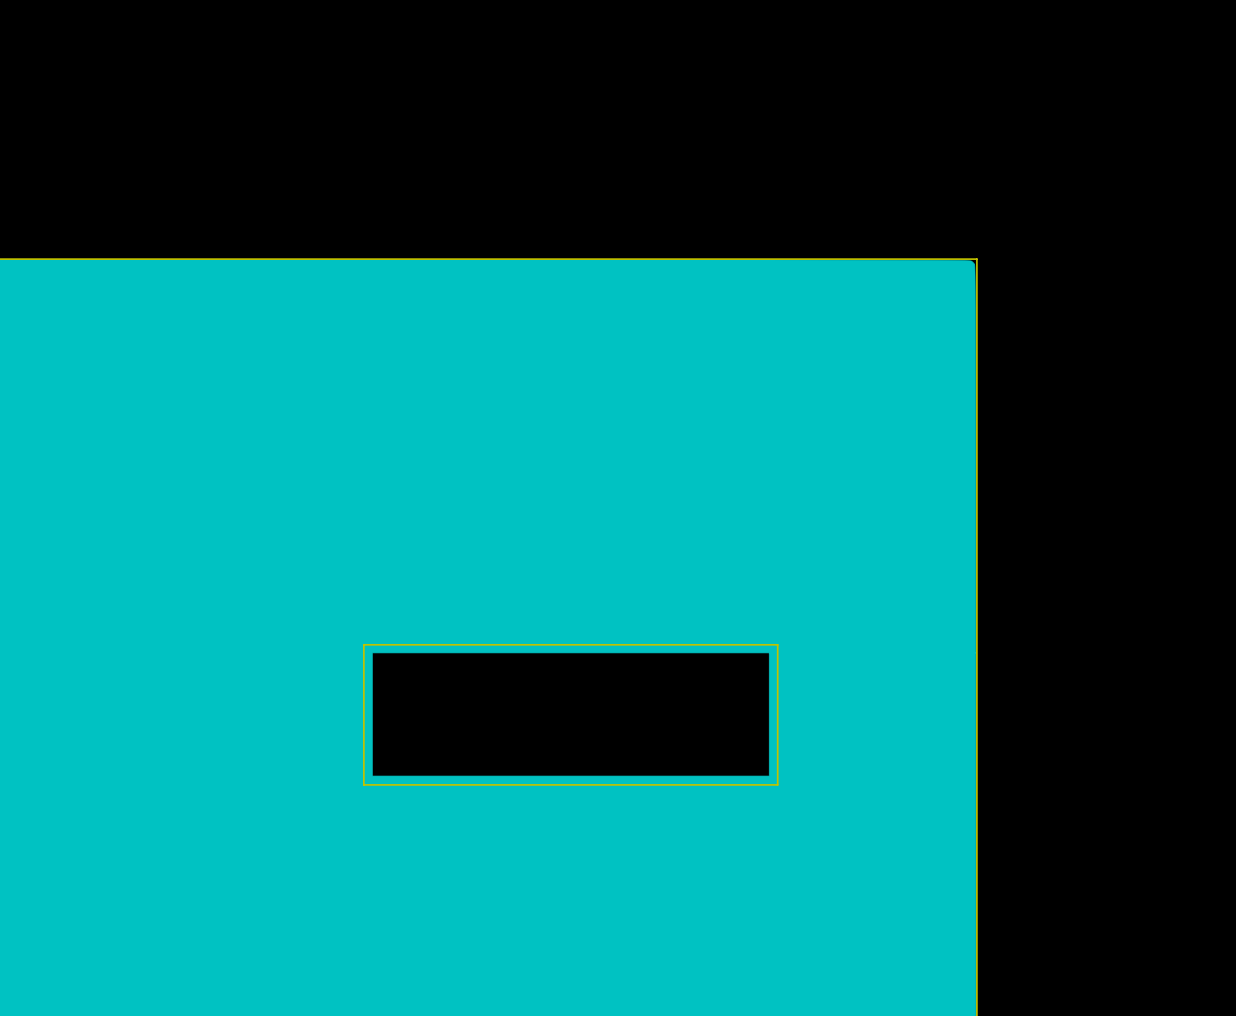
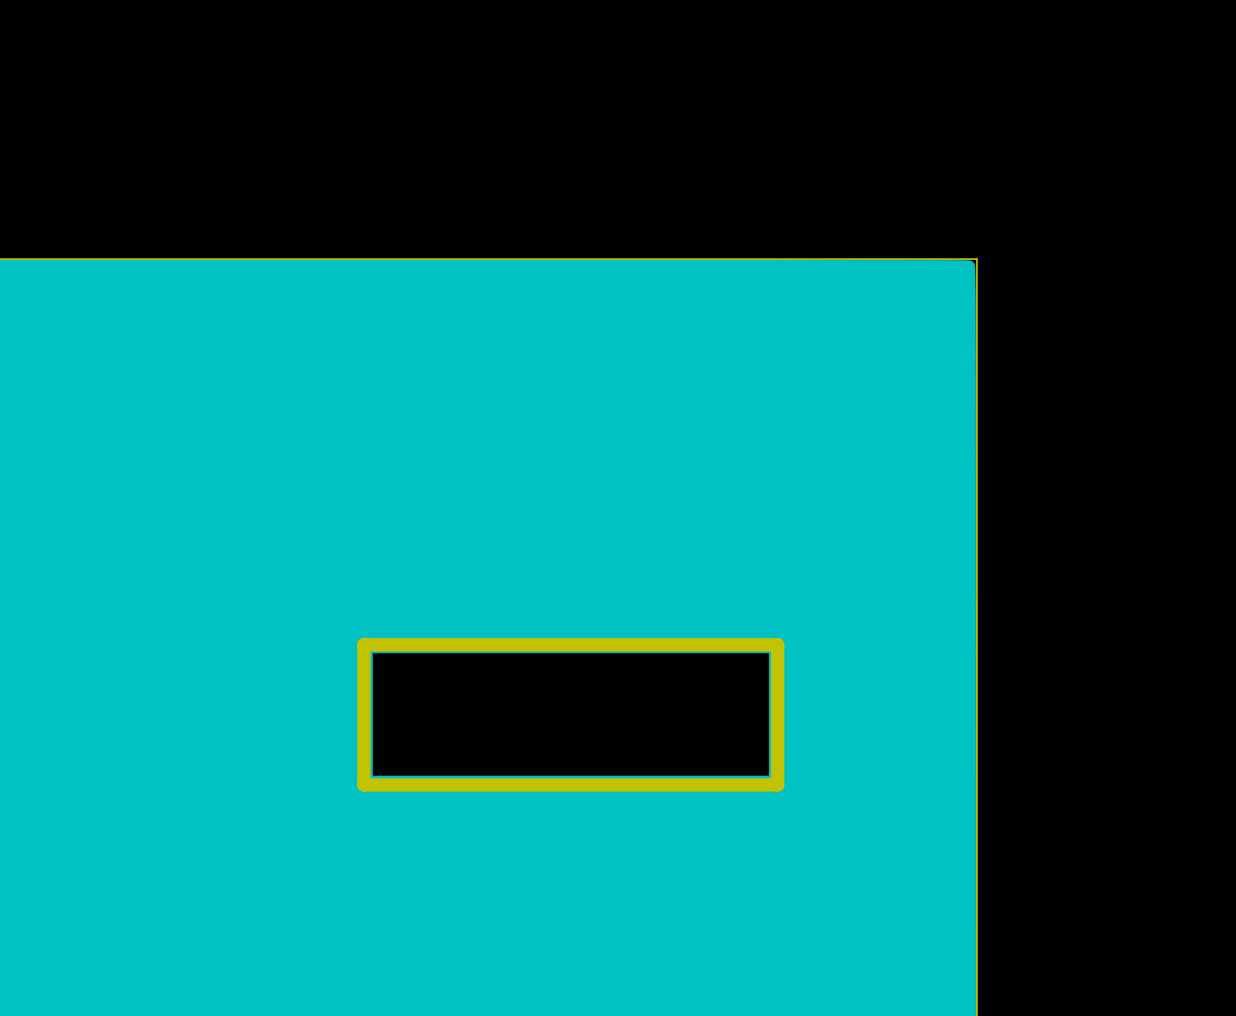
board edge width: thin (777, 644) (363, 644) (363, 784) (777, 784) (777, 644) -> thick (777, 644) (363, 644) (363, 784) (777, 784) (777, 644)

